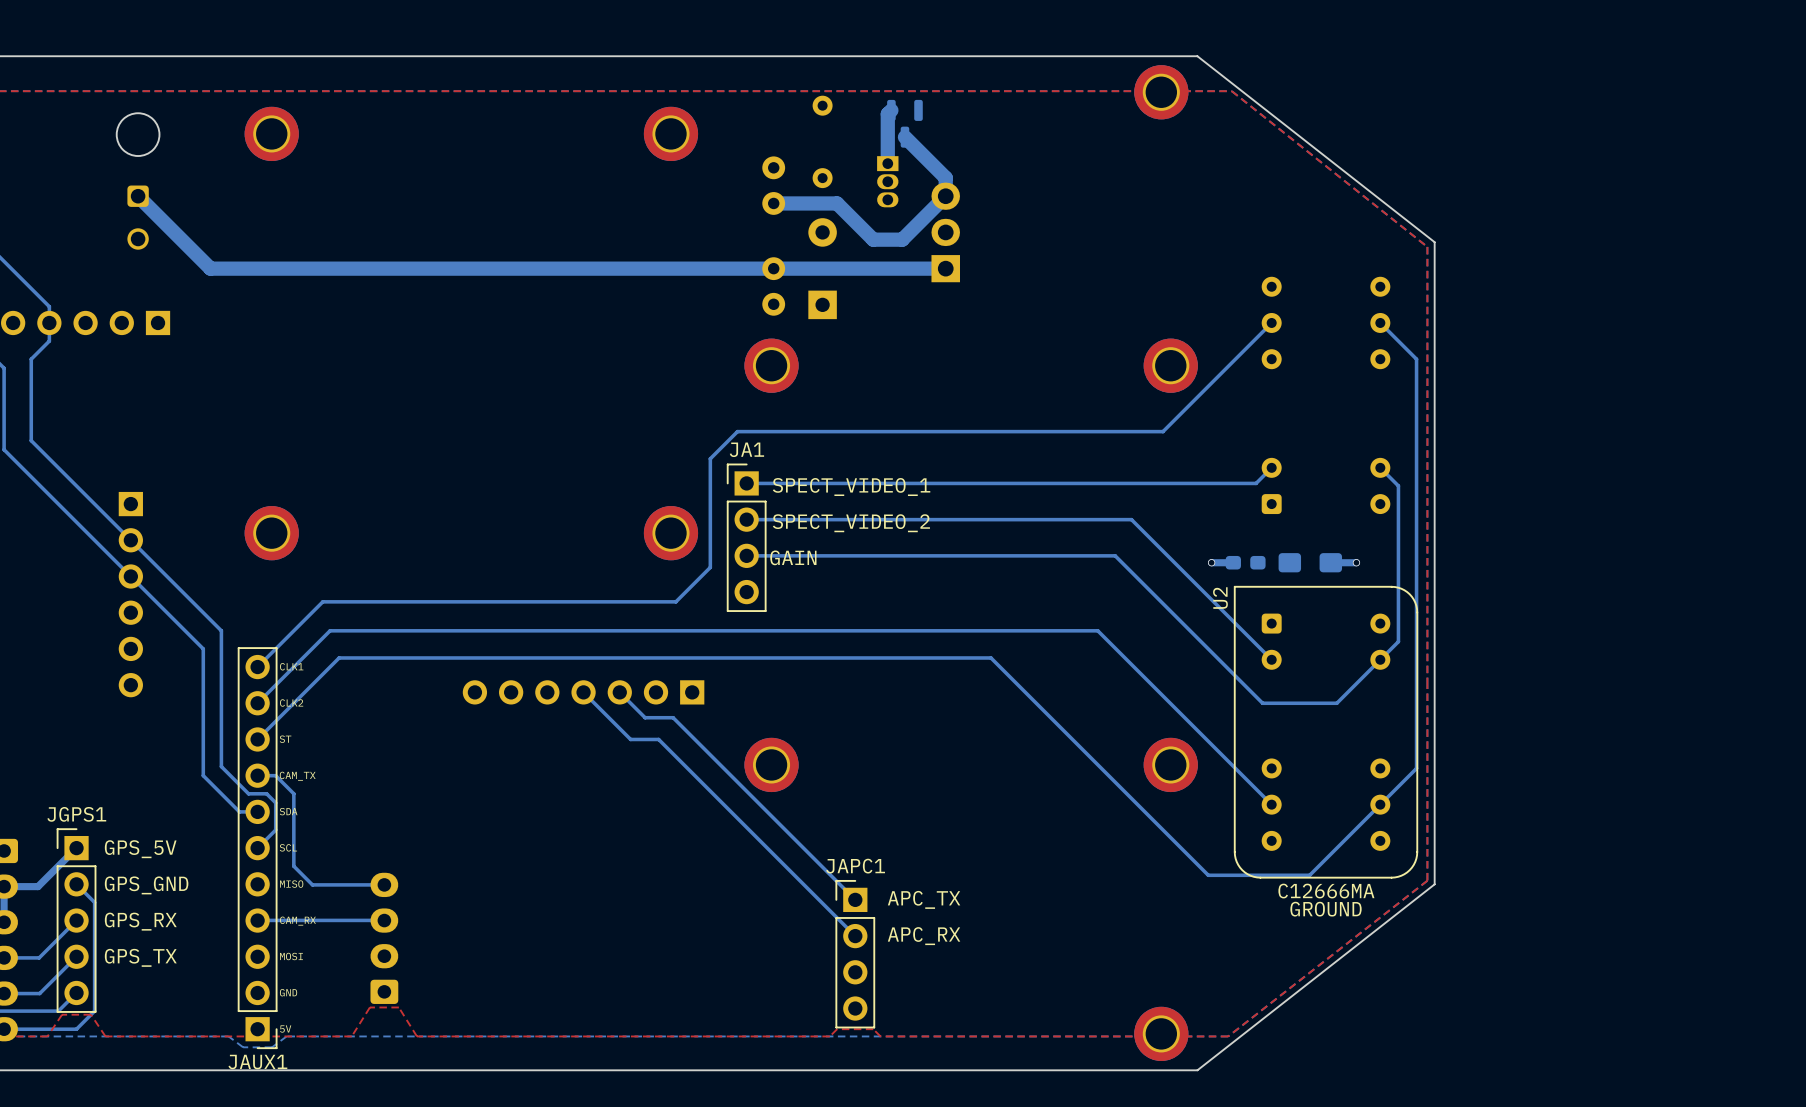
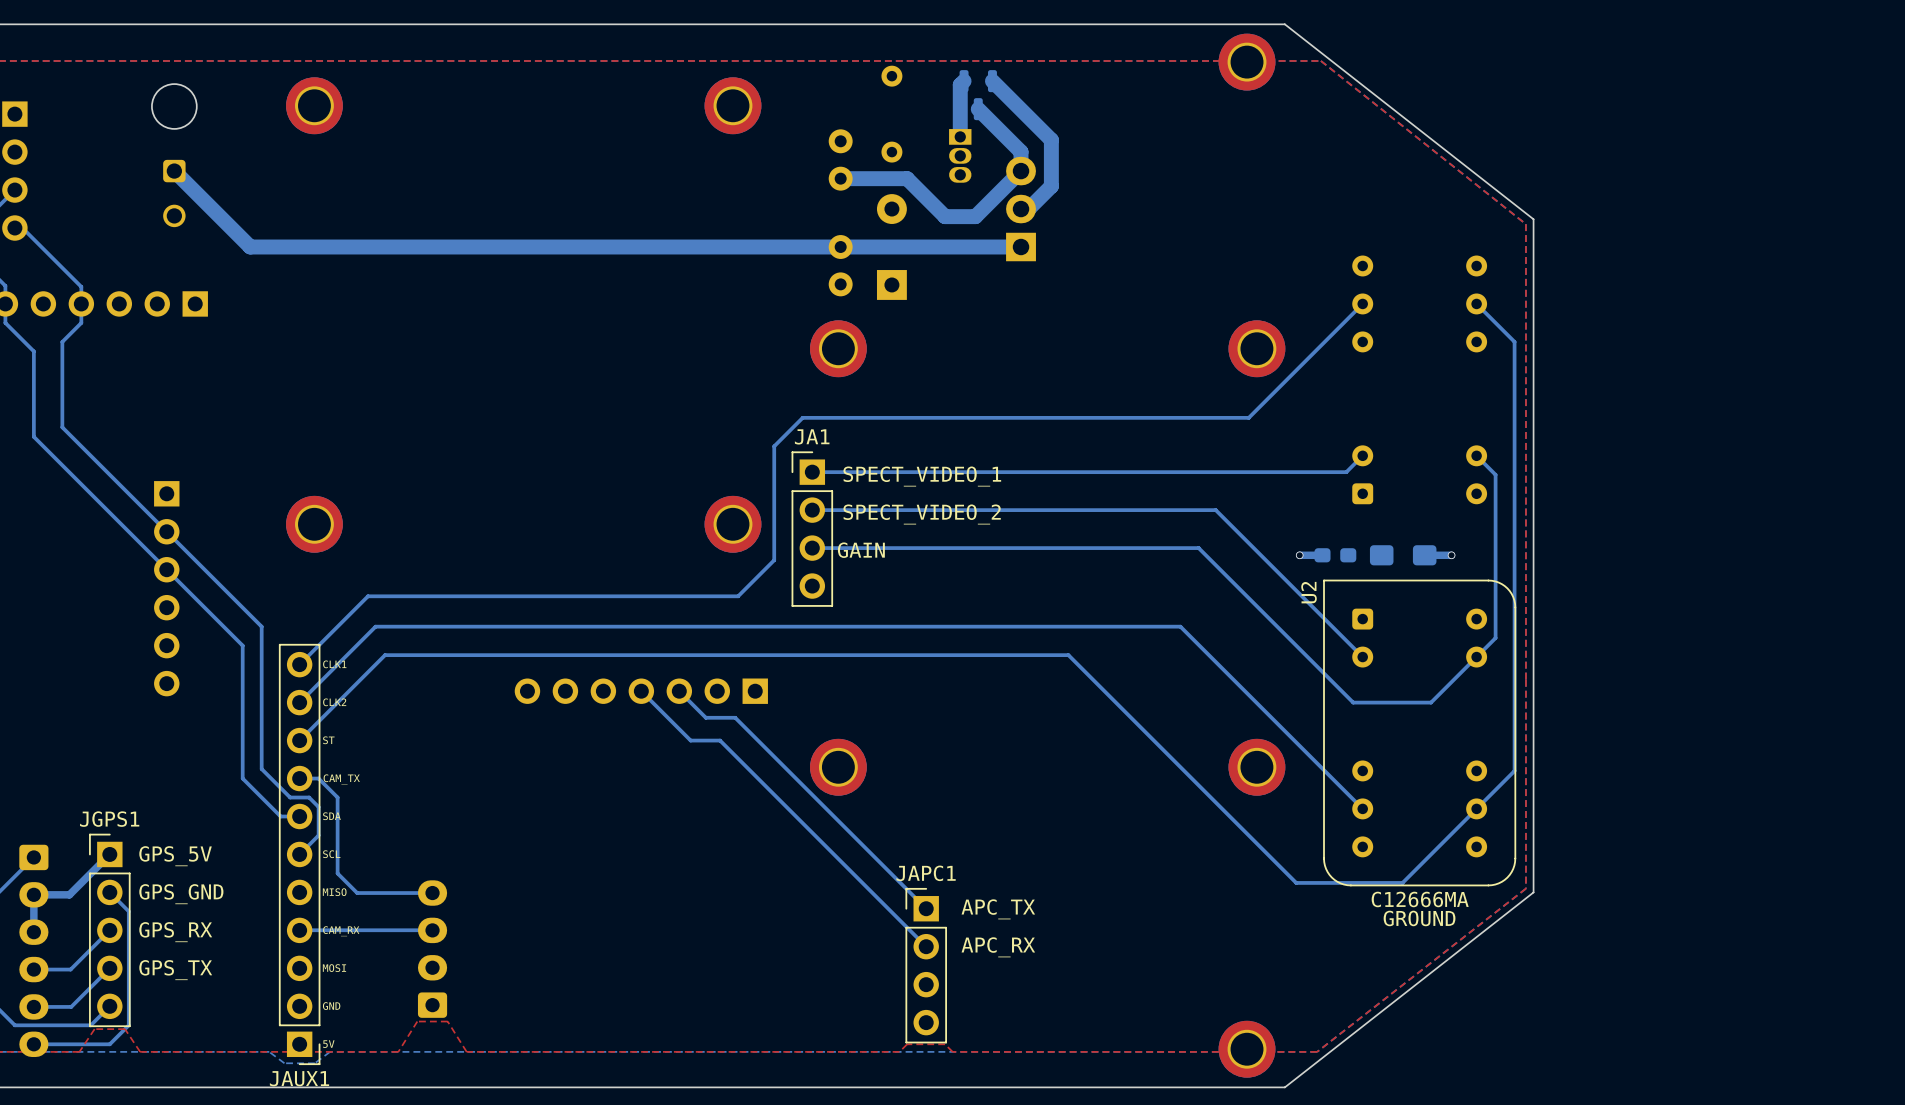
bottom track: none -> (992, 81) (1051, 140) (1051, 186) (1028, 209) (1021, 209)

